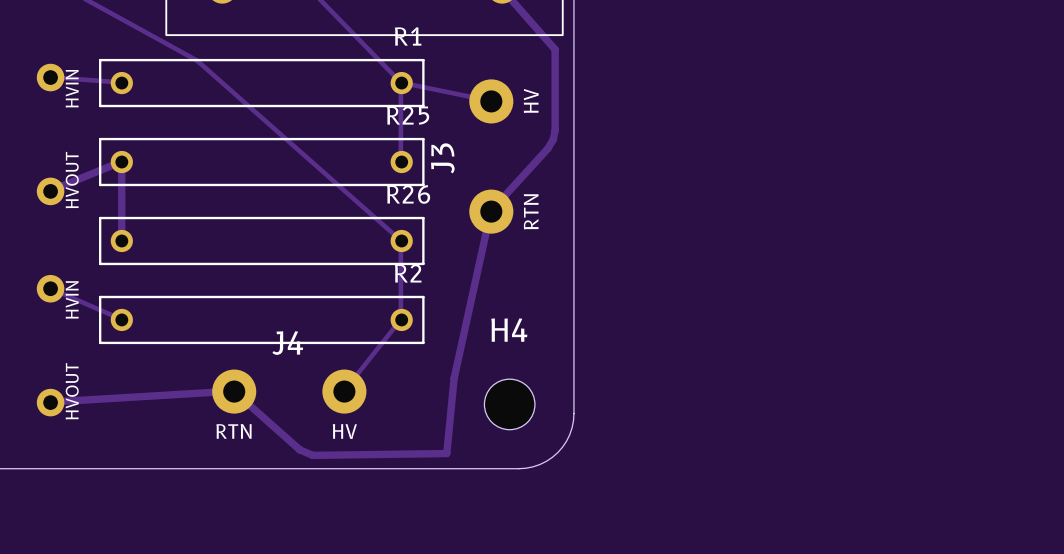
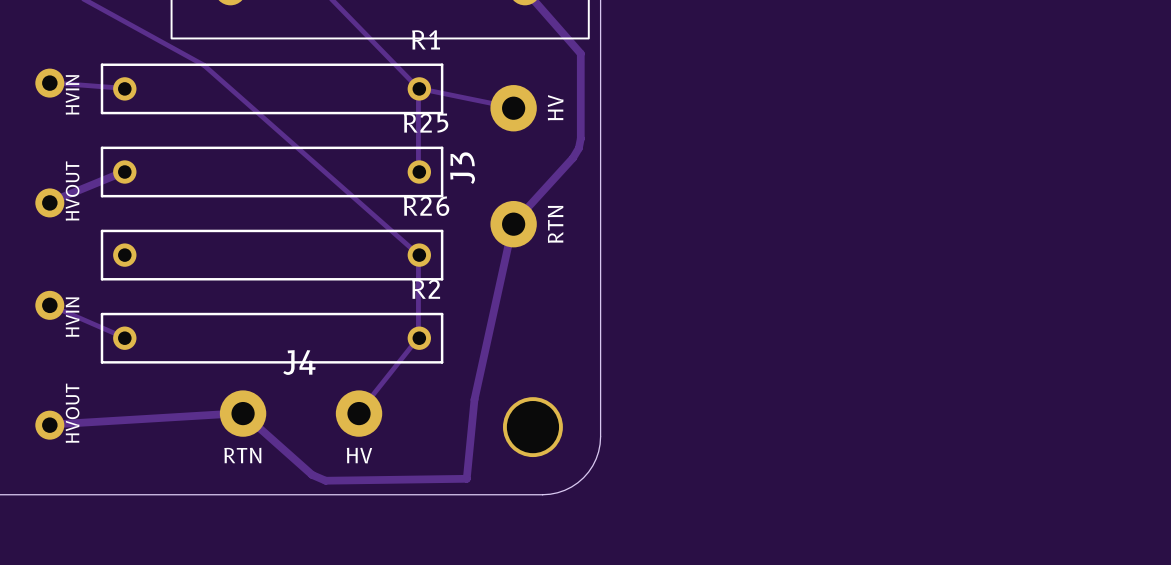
track: (121, 161) (121, 240) -> none
H4: (509, 404) -> none
part: none -> (532, 427)

